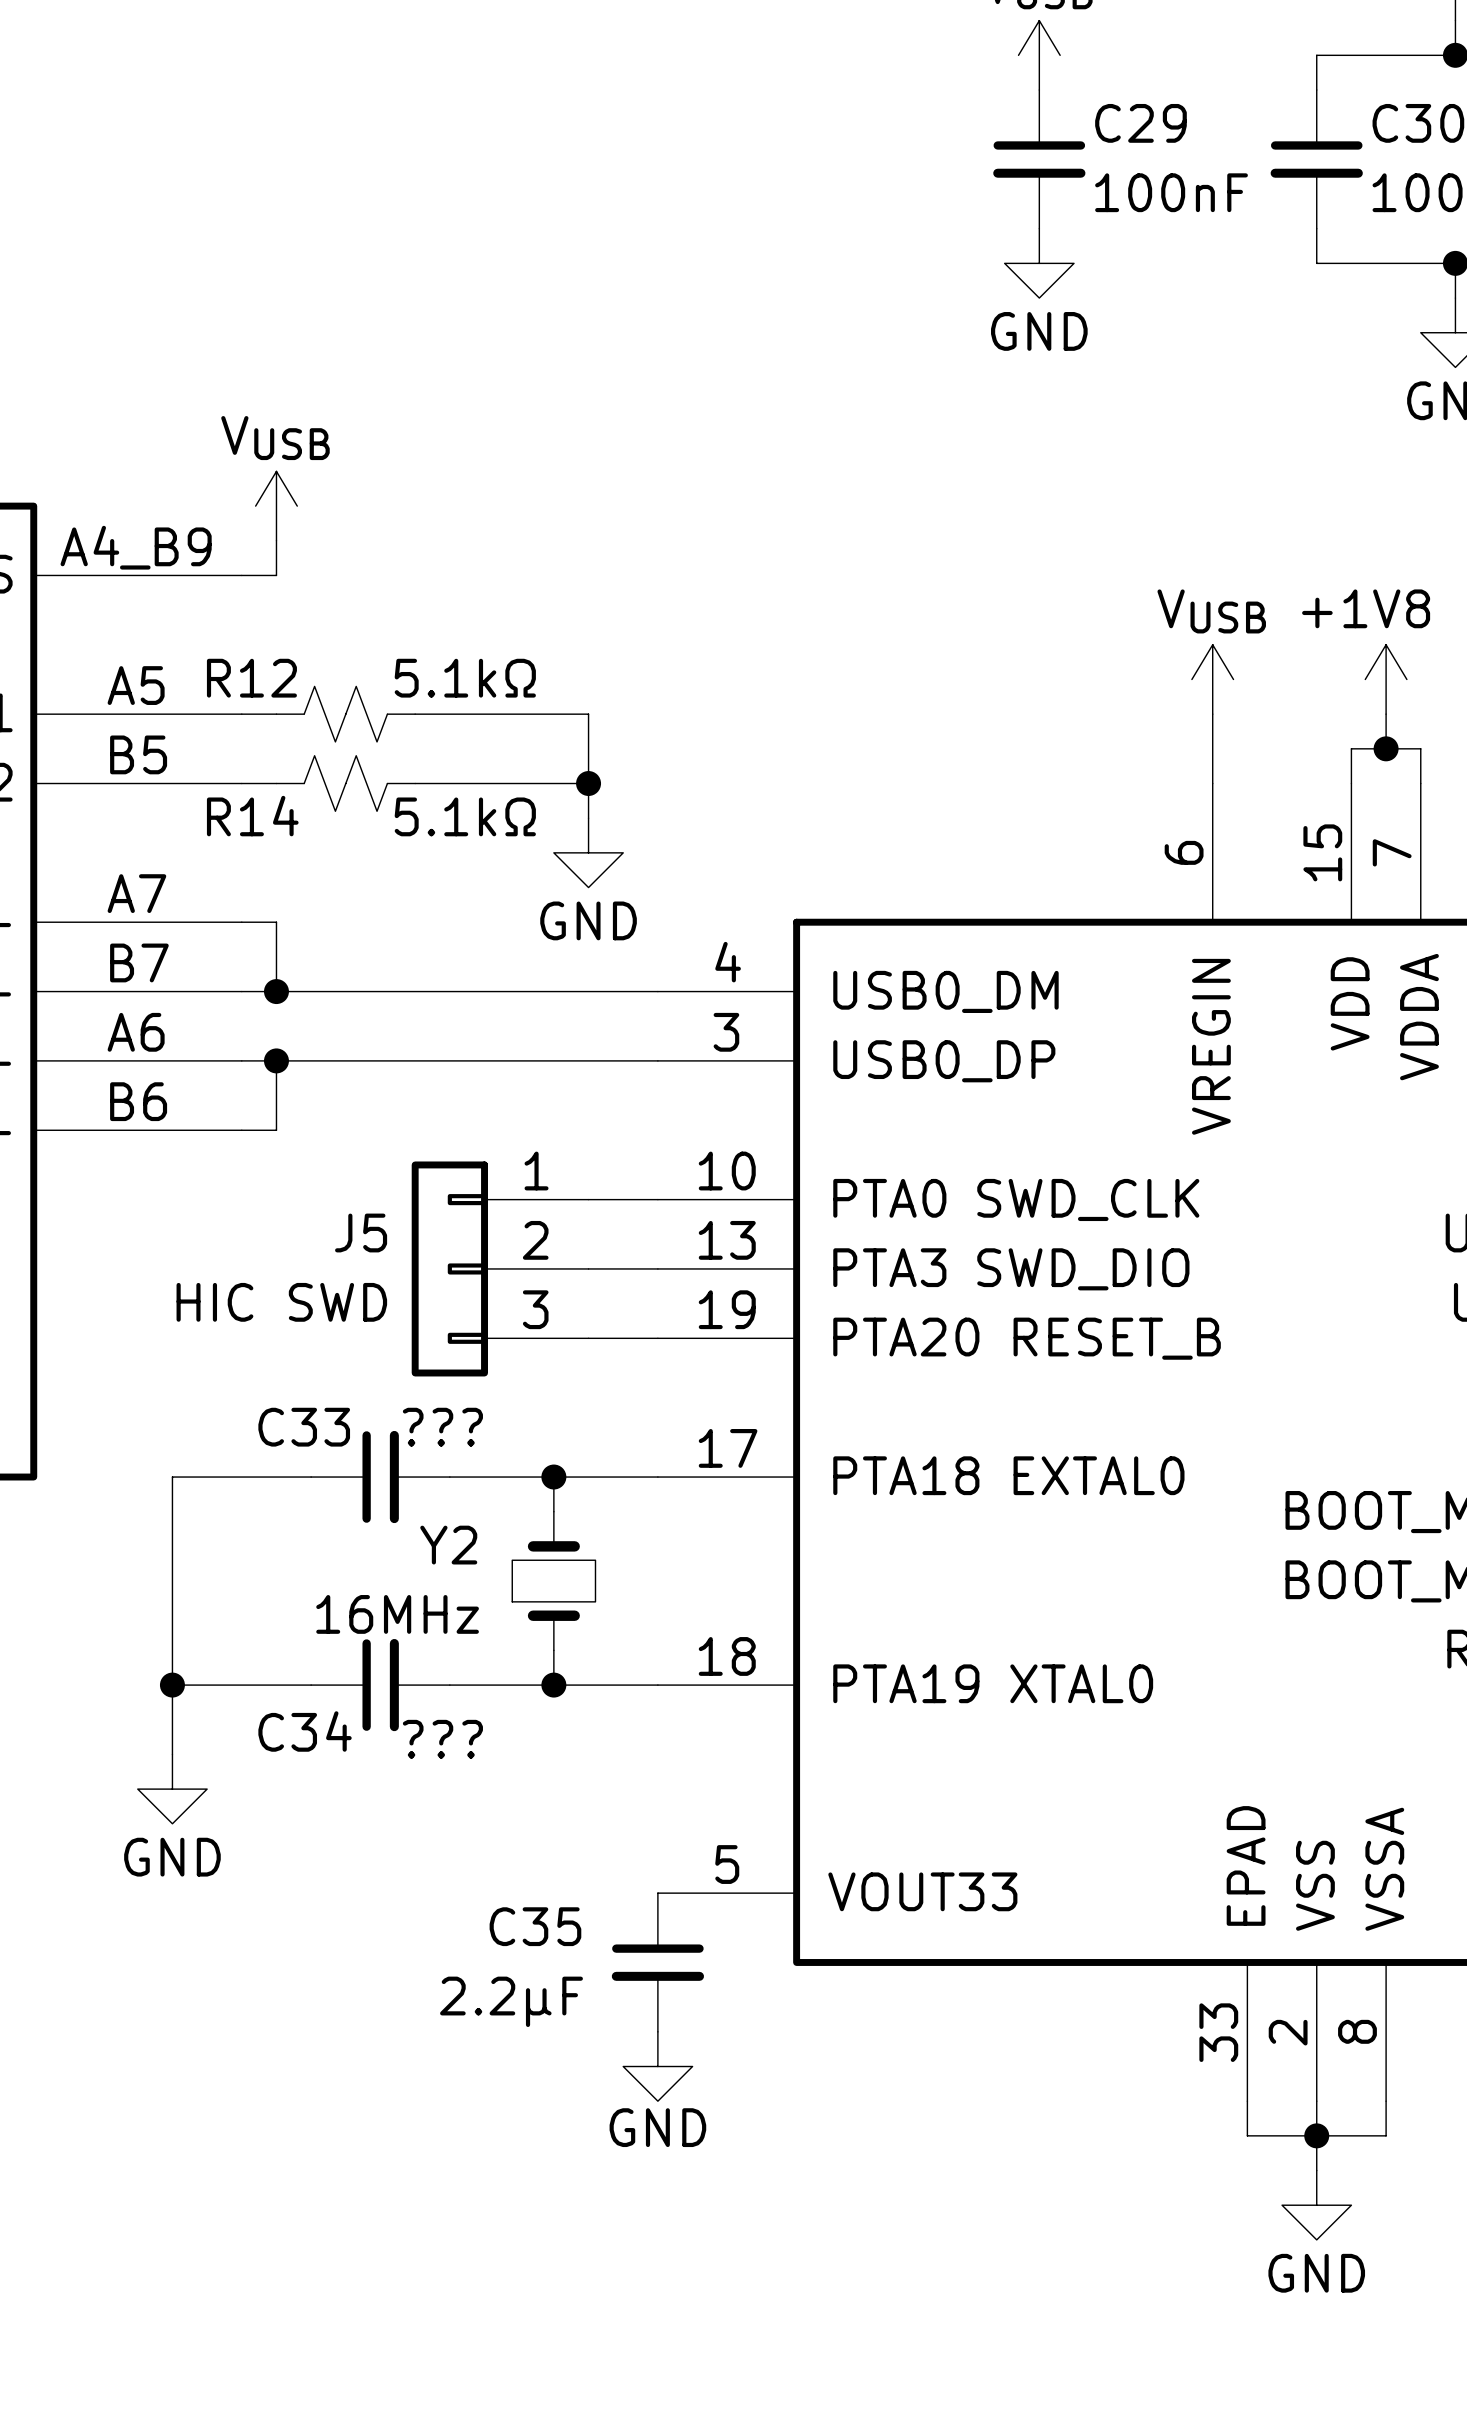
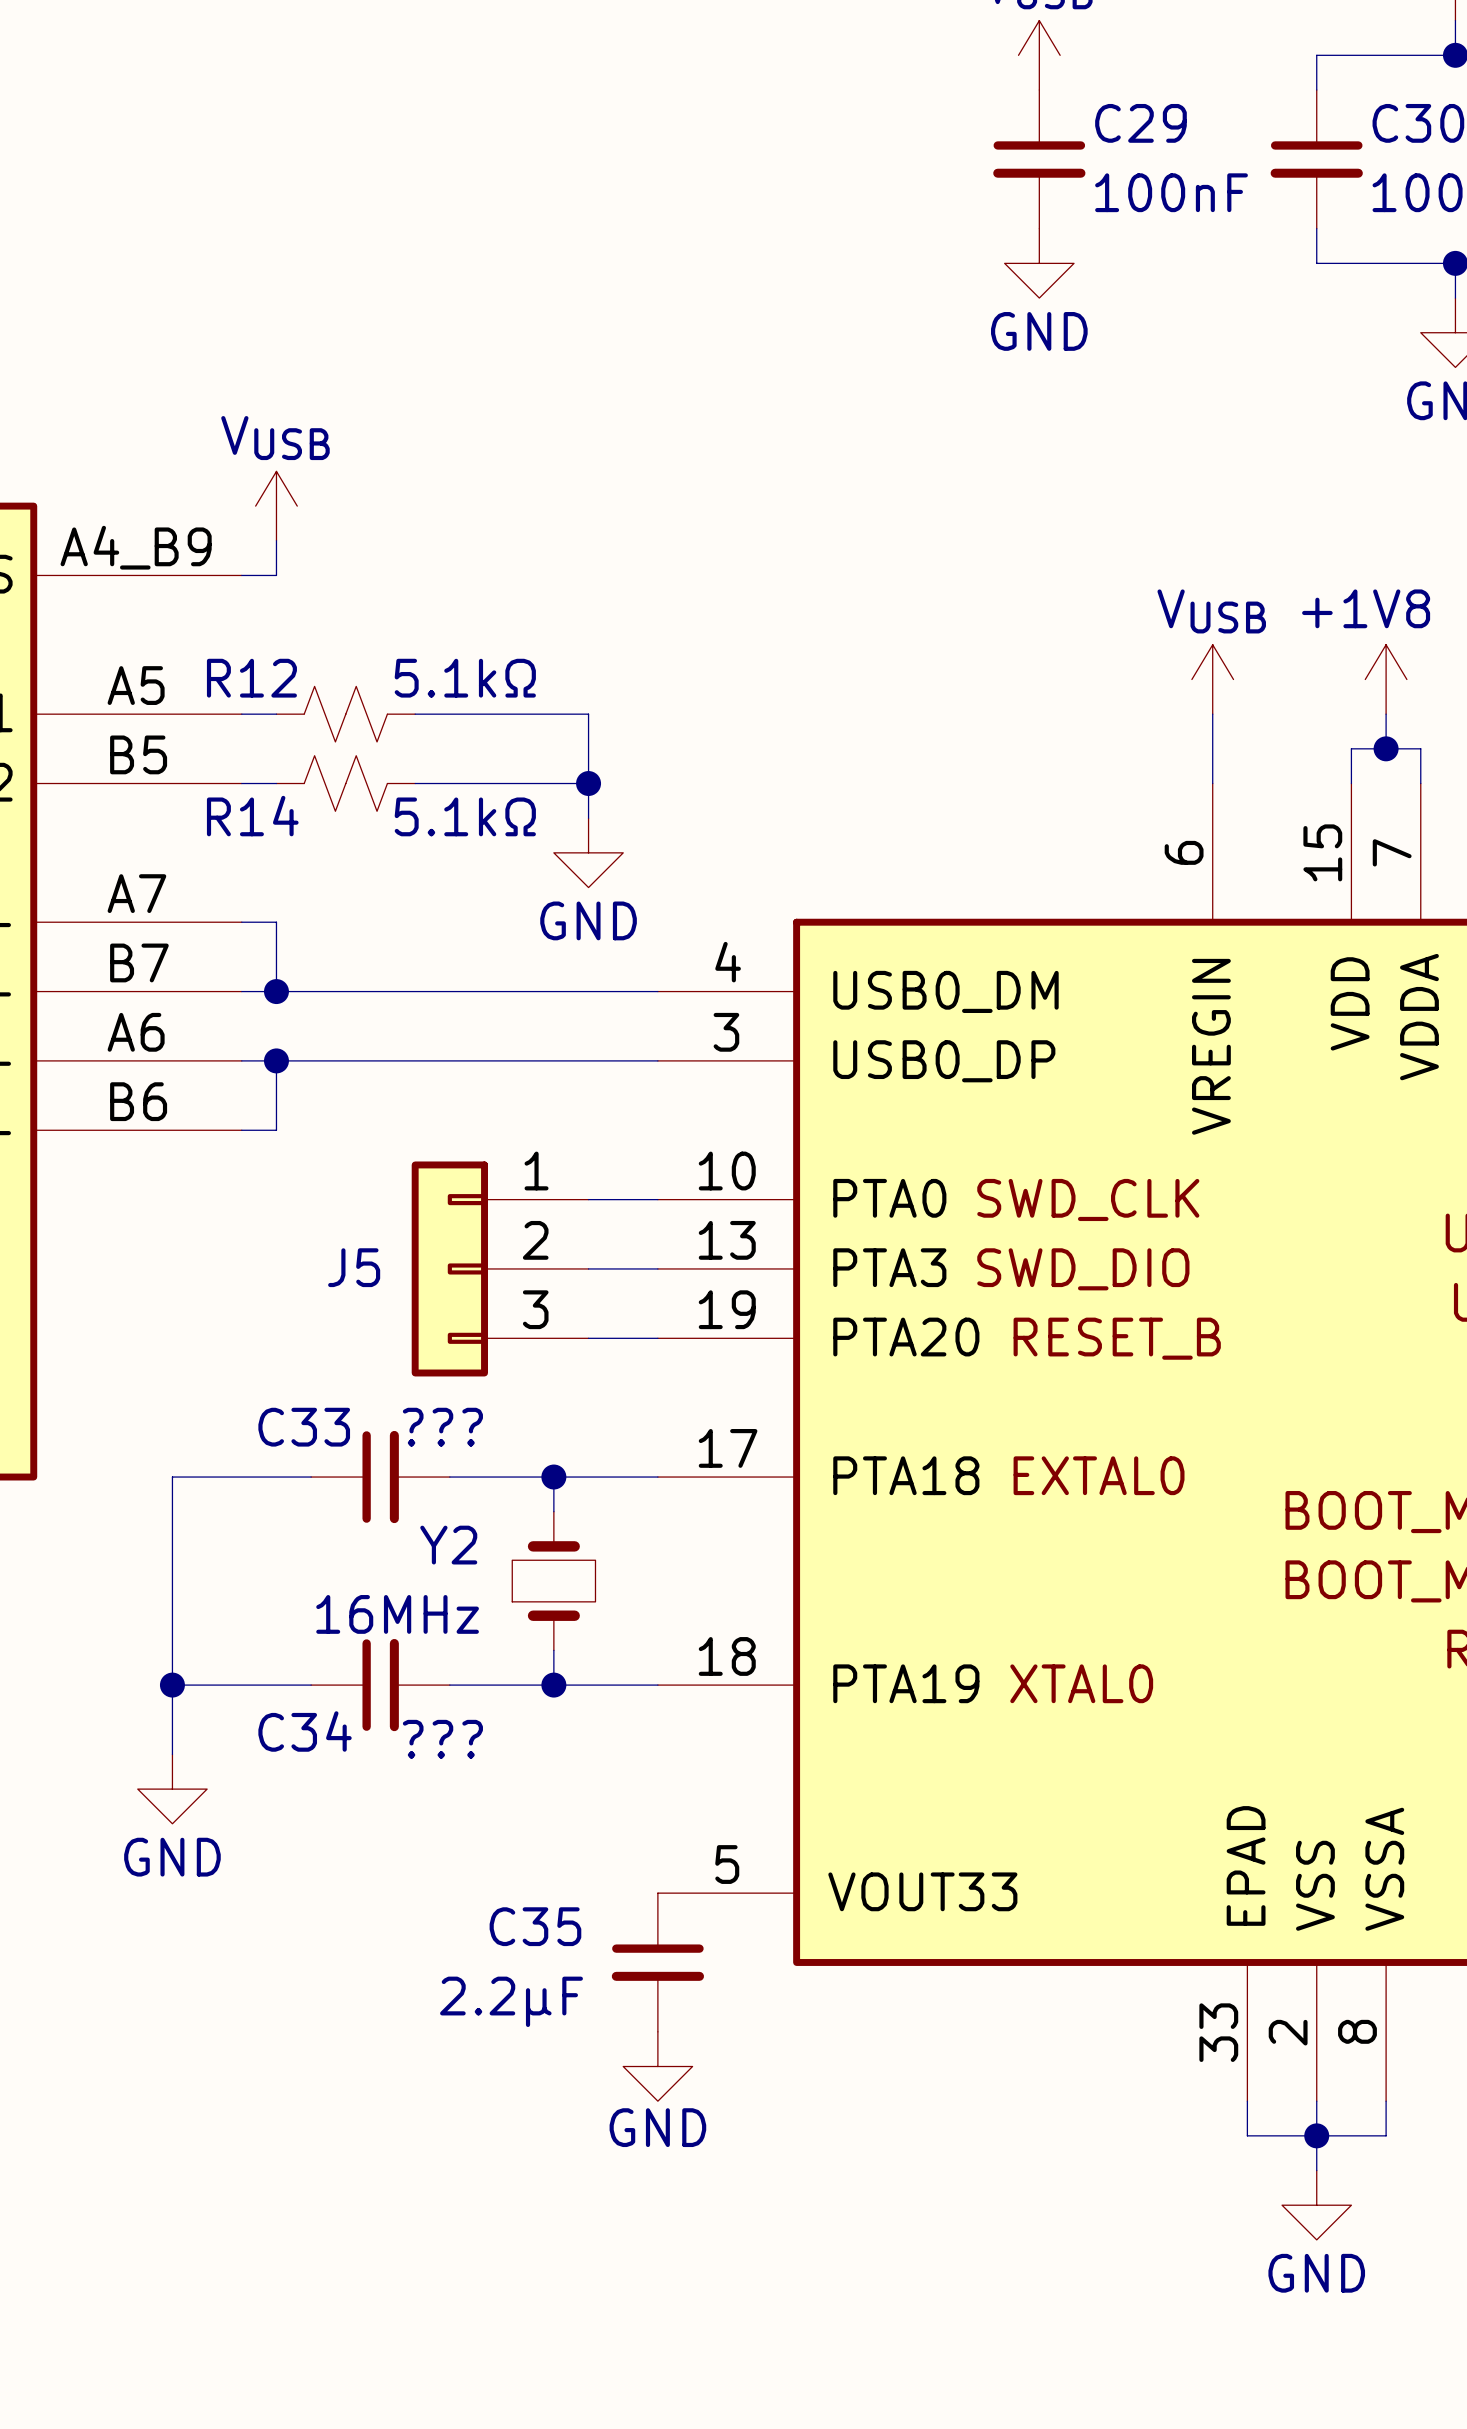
J5 name position: J5 (361, 1233) -> J5 (354, 1267)
J5 value: HIC SWD (281, 1302) -> none

